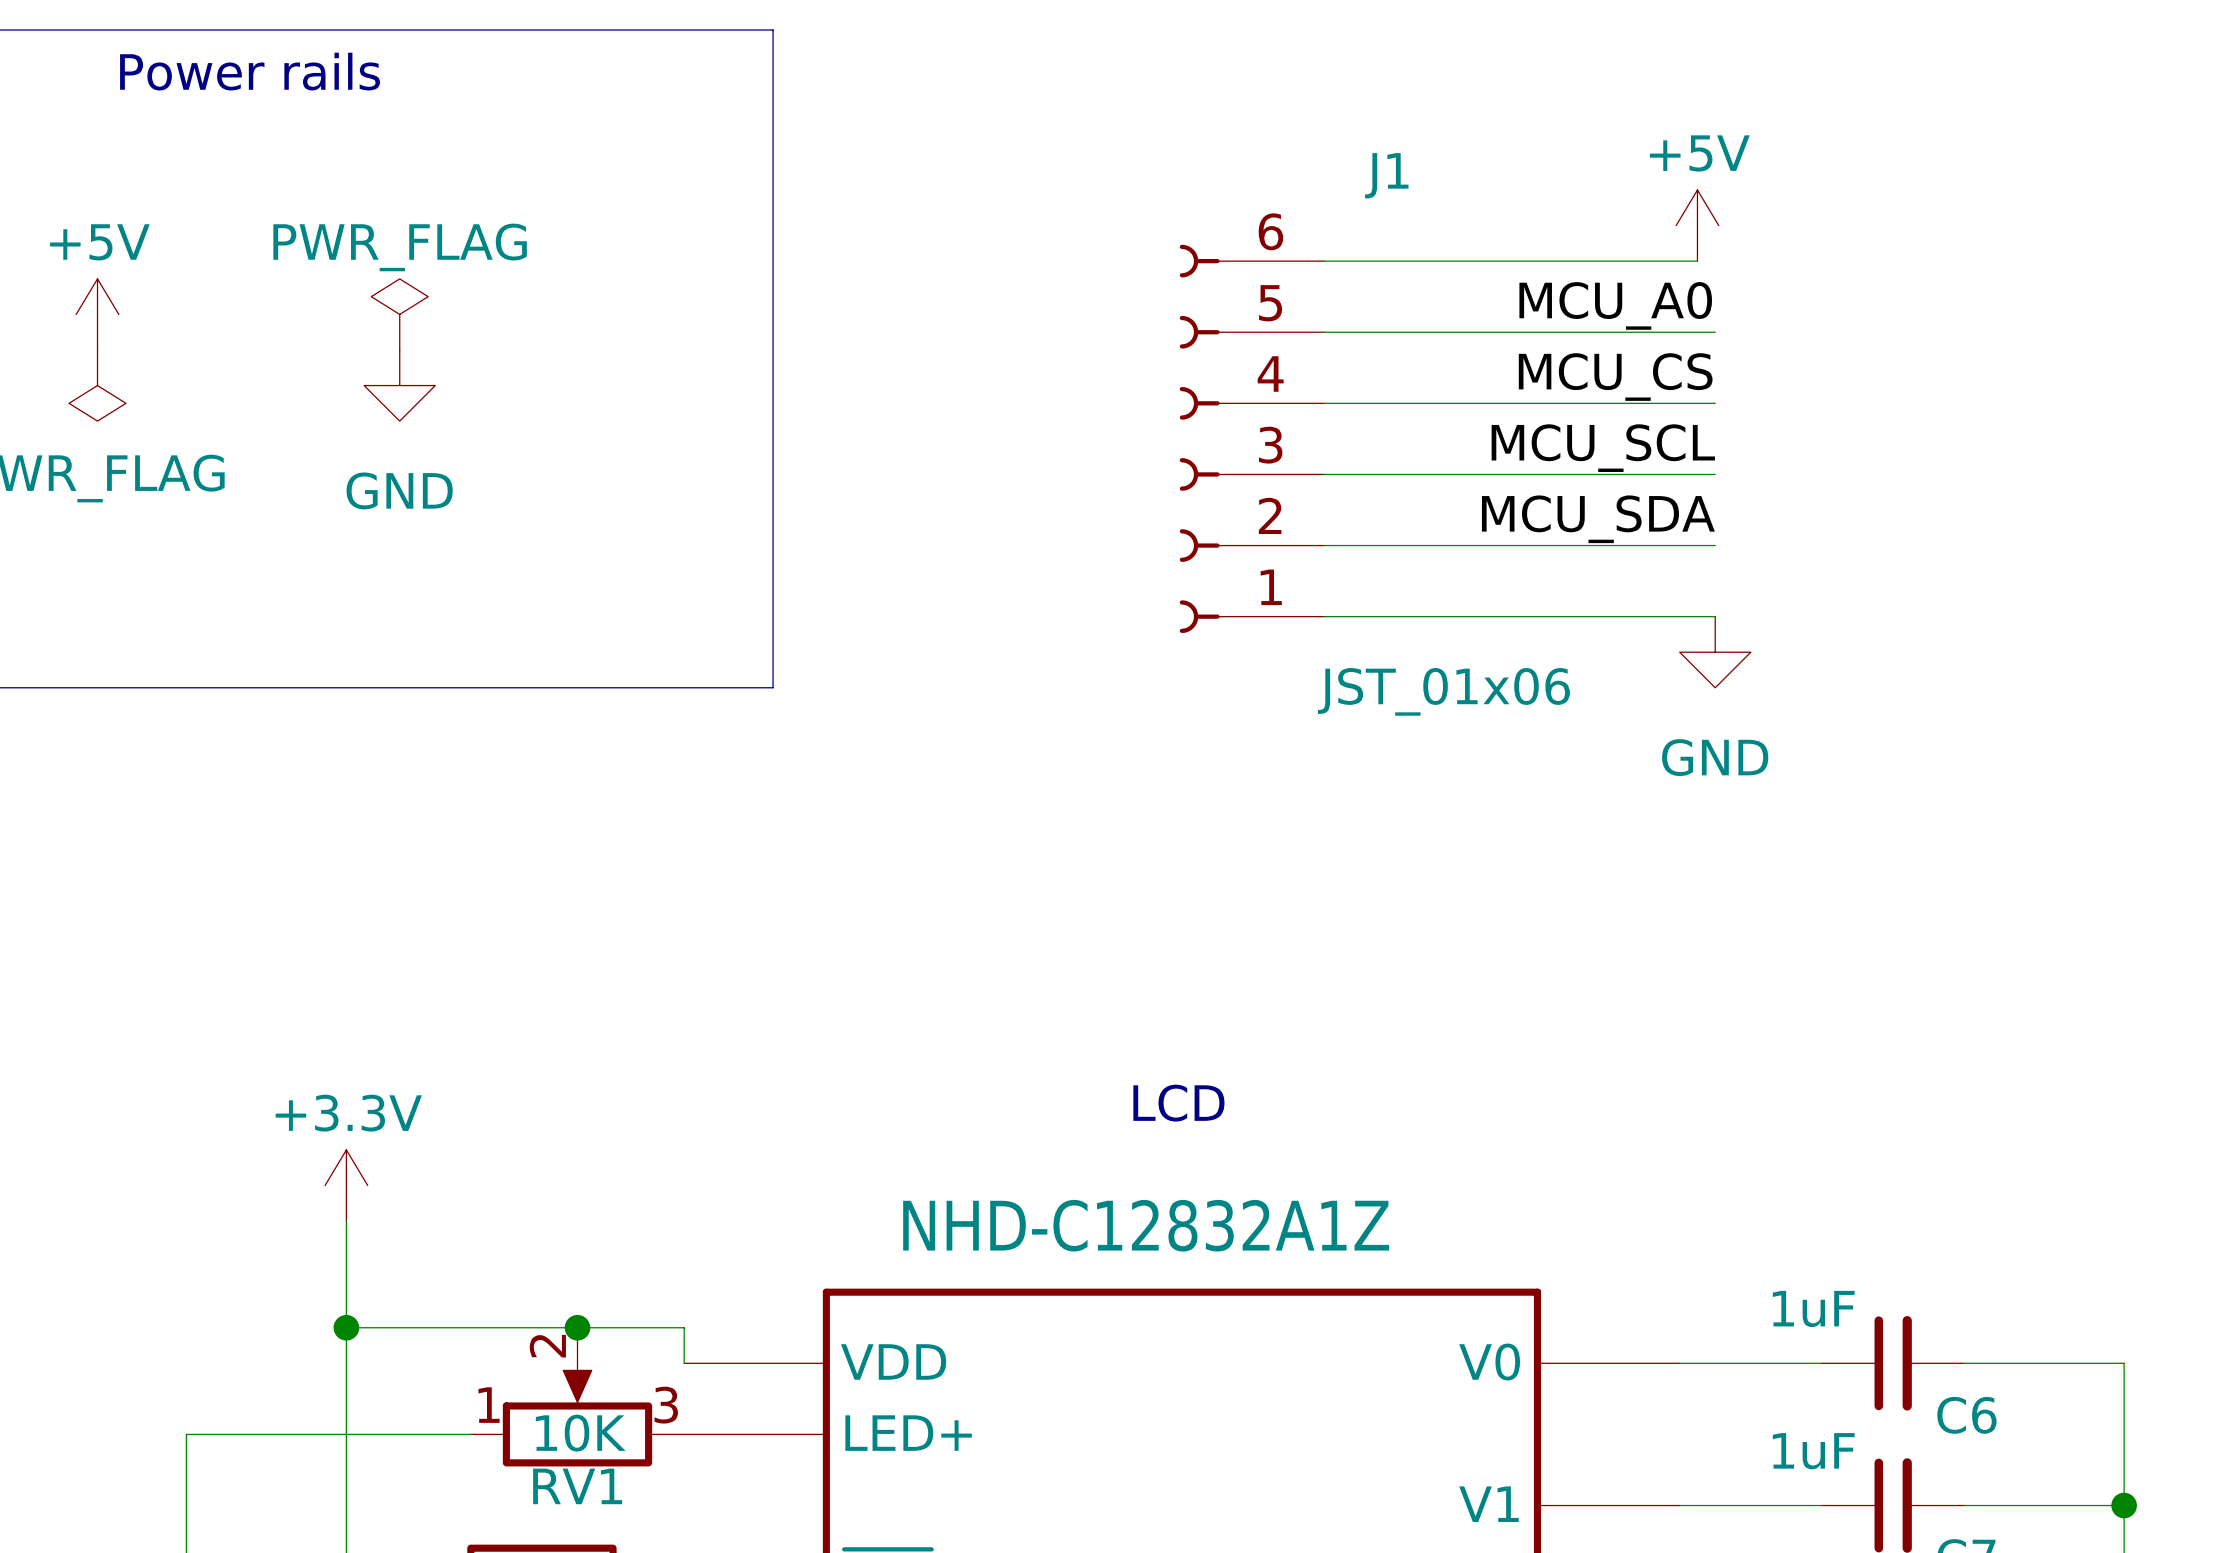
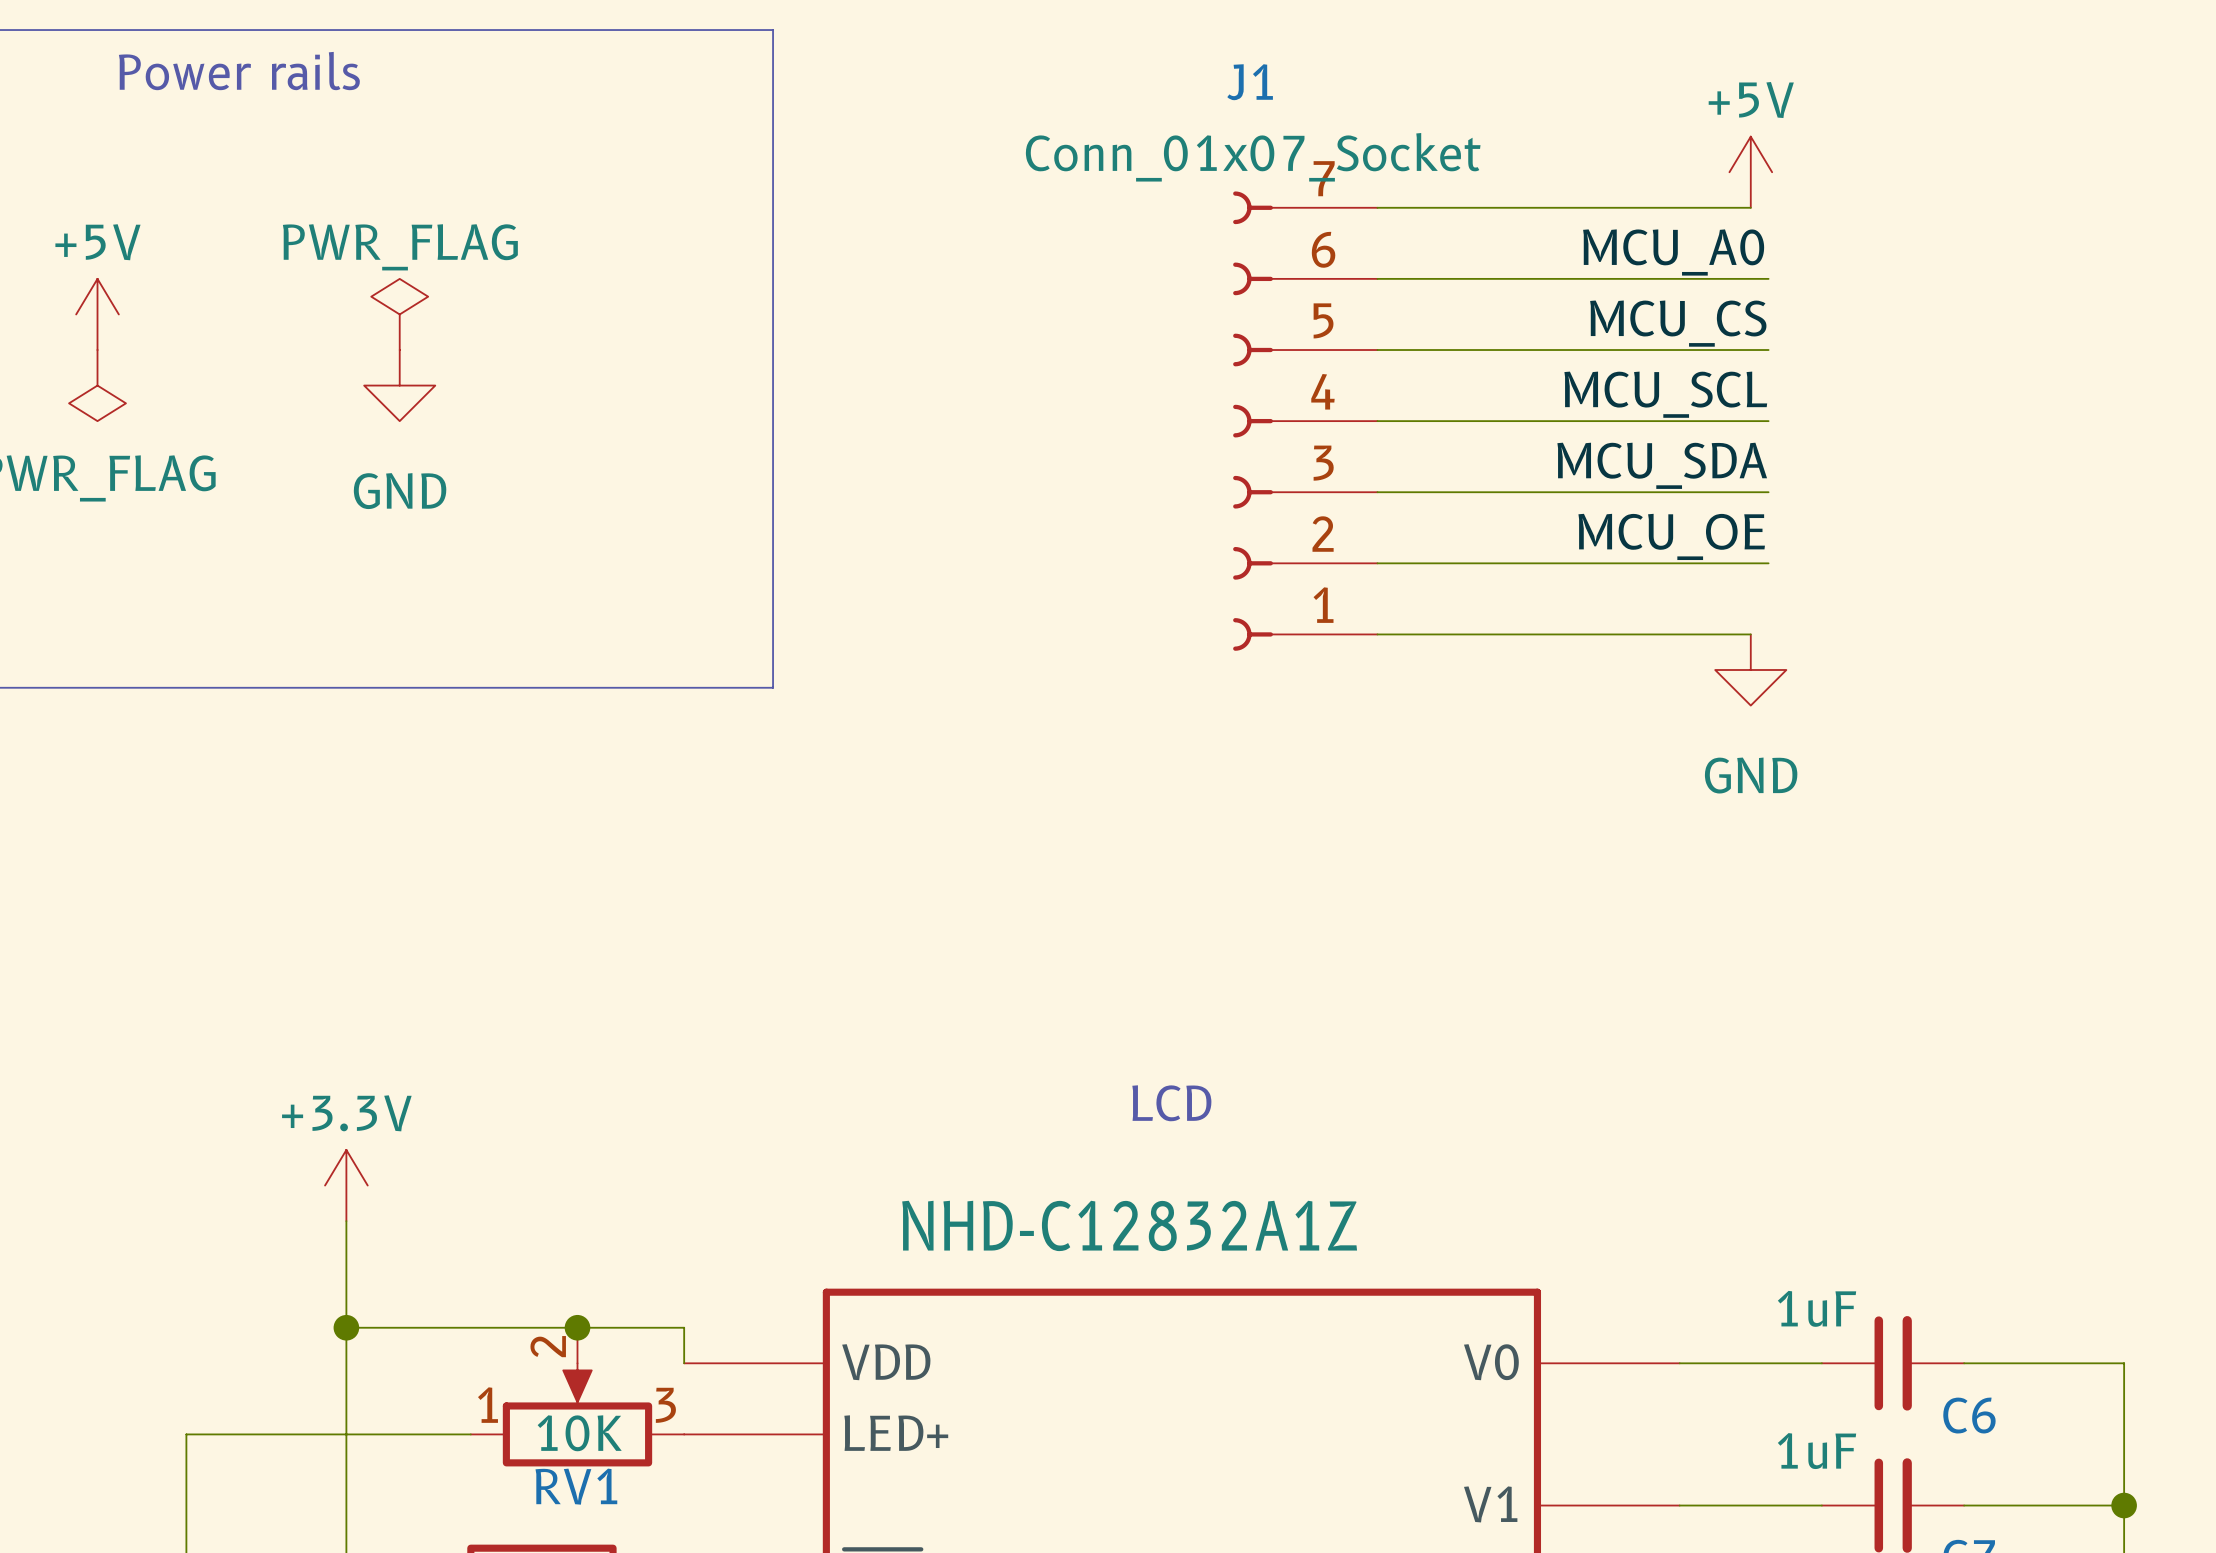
J1 name position: J1 (1386, 175) -> J1 (1250, 82)
power symbol position: +5V (1697, 225) -> +5V (1750, 172)
J1 symbol: [1179, 244, 1325, 634] -> [1233, 191, 1378, 651]
wire: (1324, 261) (1697, 261) -> (1377, 207) (1750, 207)
label position: MCU_A0 (1615, 305) -> MCU_A0 (1673, 252)
wire: (1324, 332) (1715, 332) -> (1377, 278) (1768, 278)
label position: MCU_CS (1615, 377) -> MCU_CS (1678, 323)
wire: (1324, 403) (1715, 403) -> (1377, 350) (1768, 350)
label position: MCU_SCL (1603, 448) -> MCU_SCL (1665, 394)
wire: (1324, 474) (1715, 474) -> (1377, 421) (1768, 421)
label position: MCU_SDA (1598, 519) -> MCU_SDA (1662, 465)
label: none -> MCU_OE (1671, 536)
wire: (1324, 545) (1715, 545) -> (1377, 492) (1768, 492)
wire: (1324, 616) (1715, 616) -> (1377, 563) (1768, 563)
wire: none -> (1377, 634) (1750, 634)
power symbol position: GND (1715, 652) -> GND (1750, 669)
J1 value: JST_01x06 (1443, 691) -> Conn_01x07_Socket (1253, 157)

